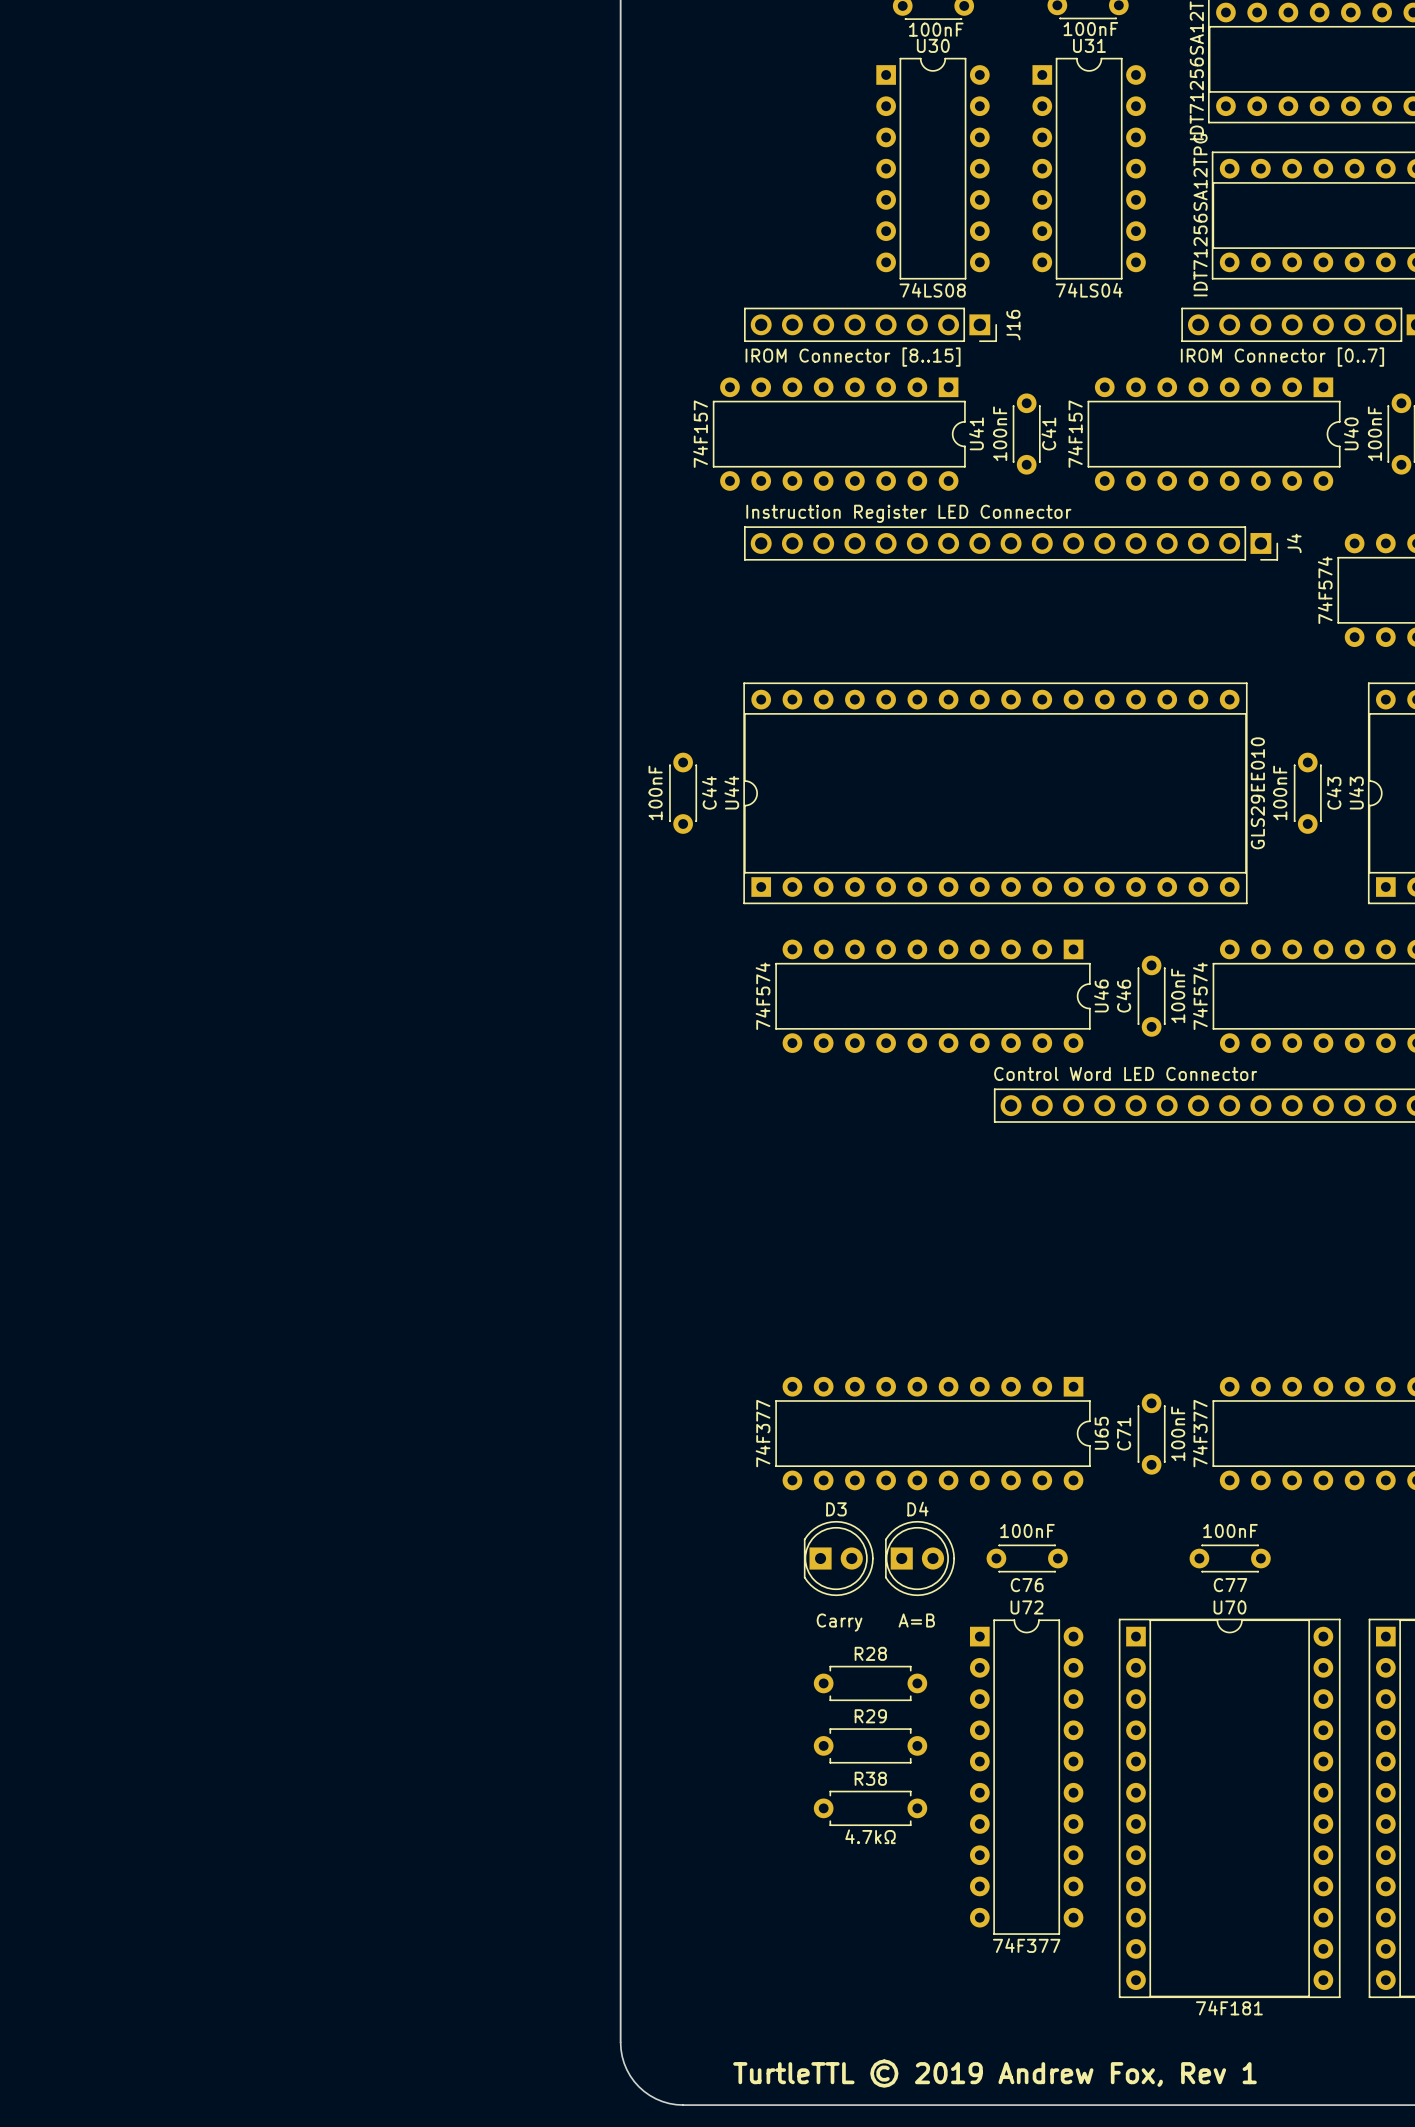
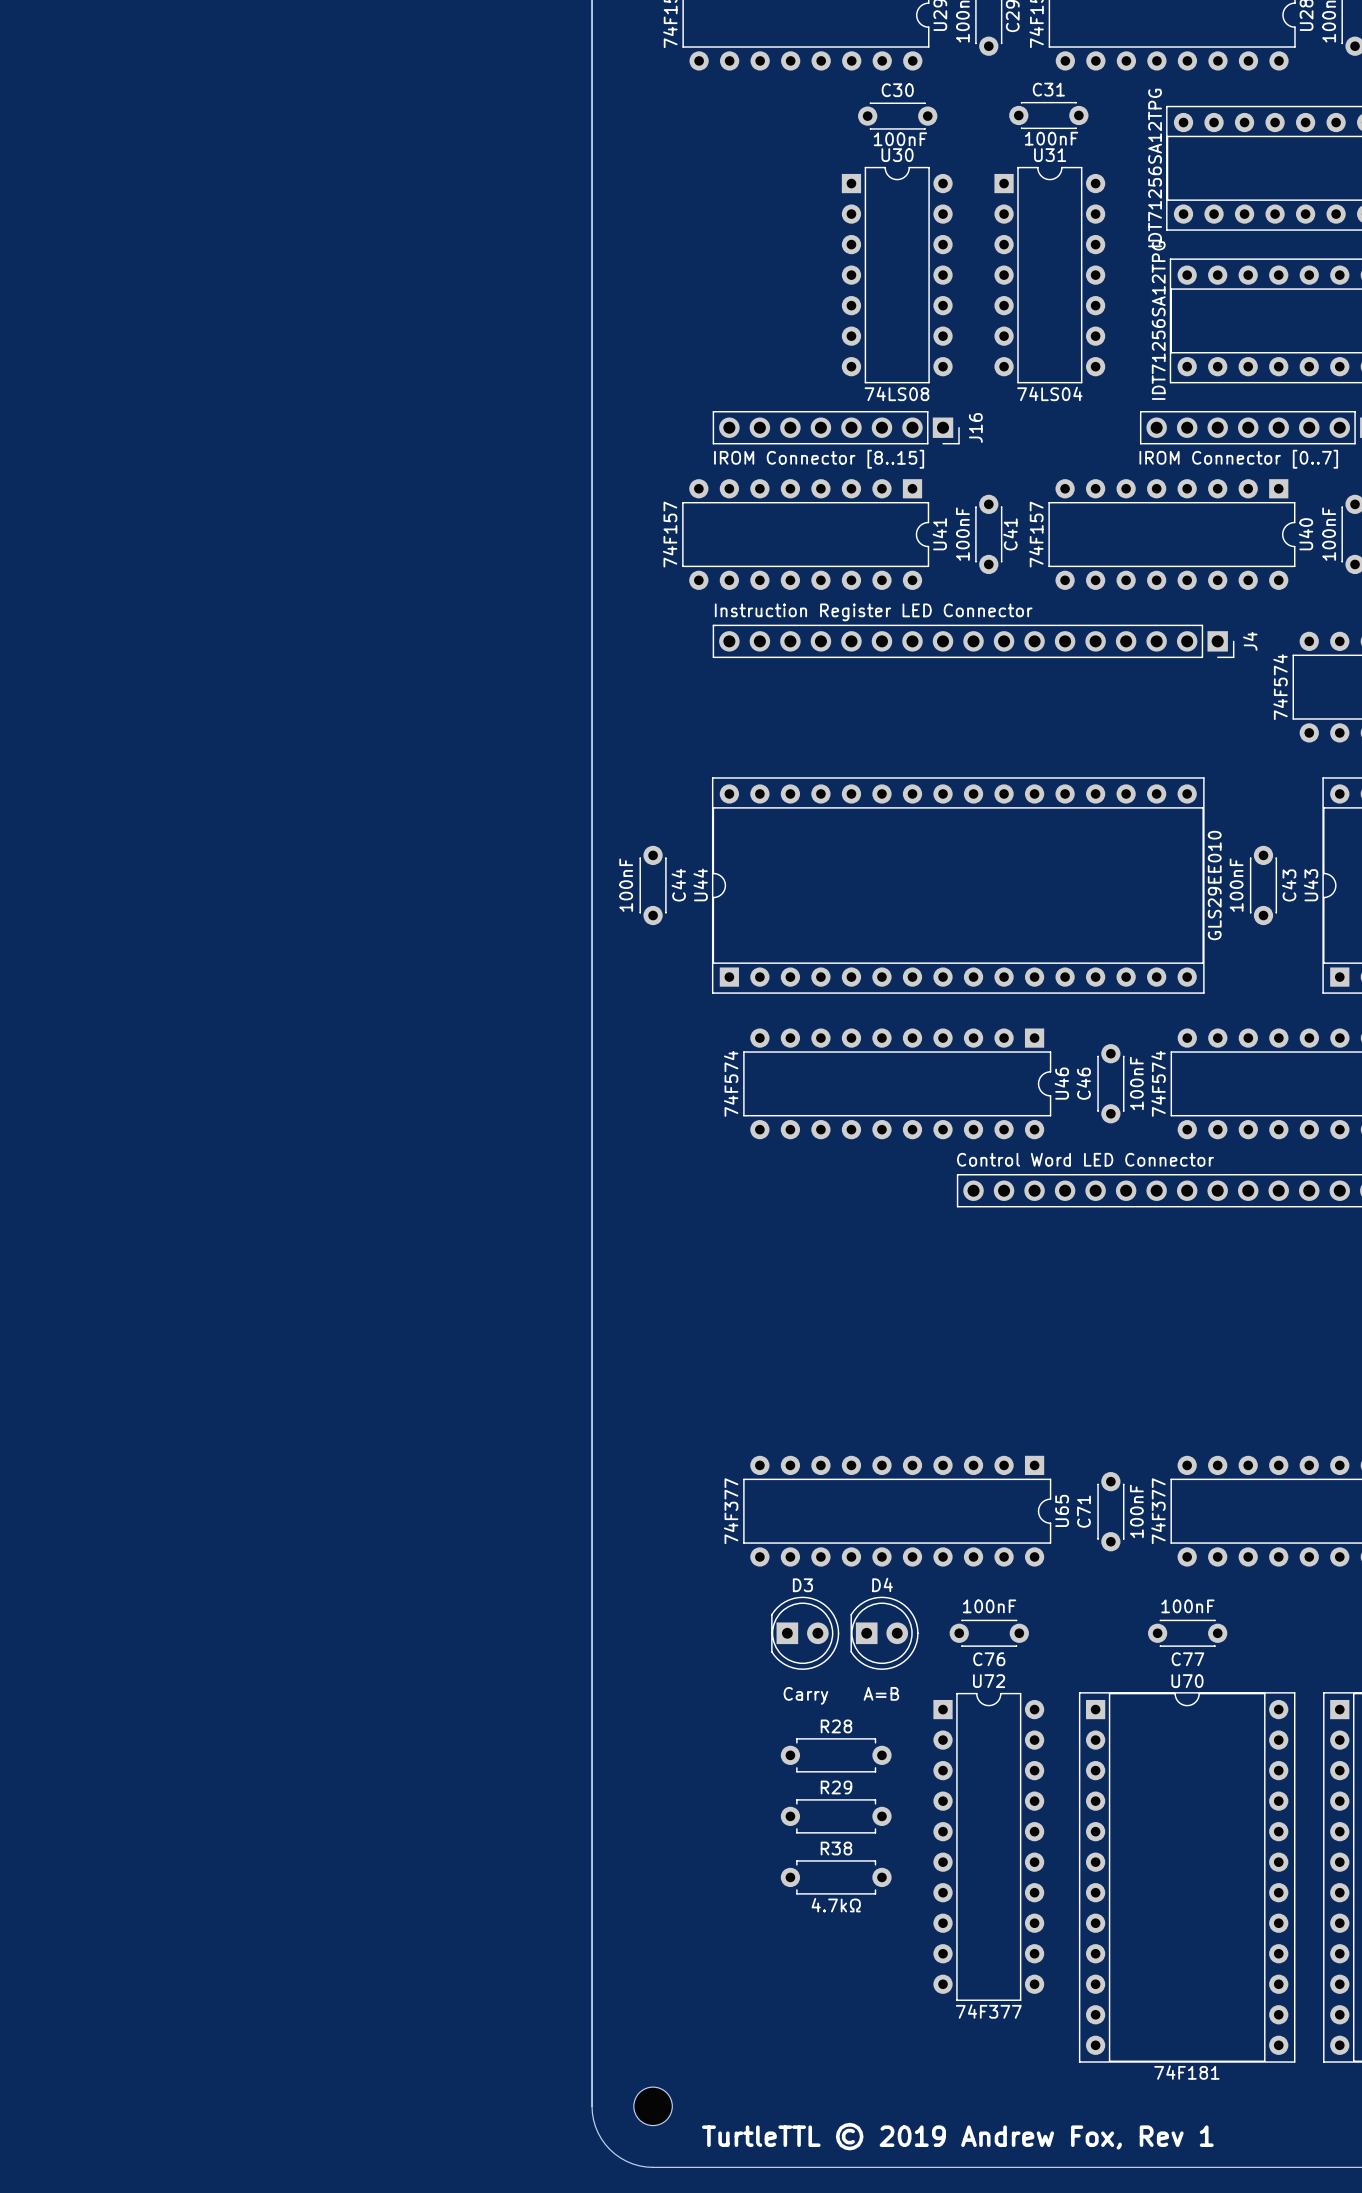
part: none -> (653, 2106)

